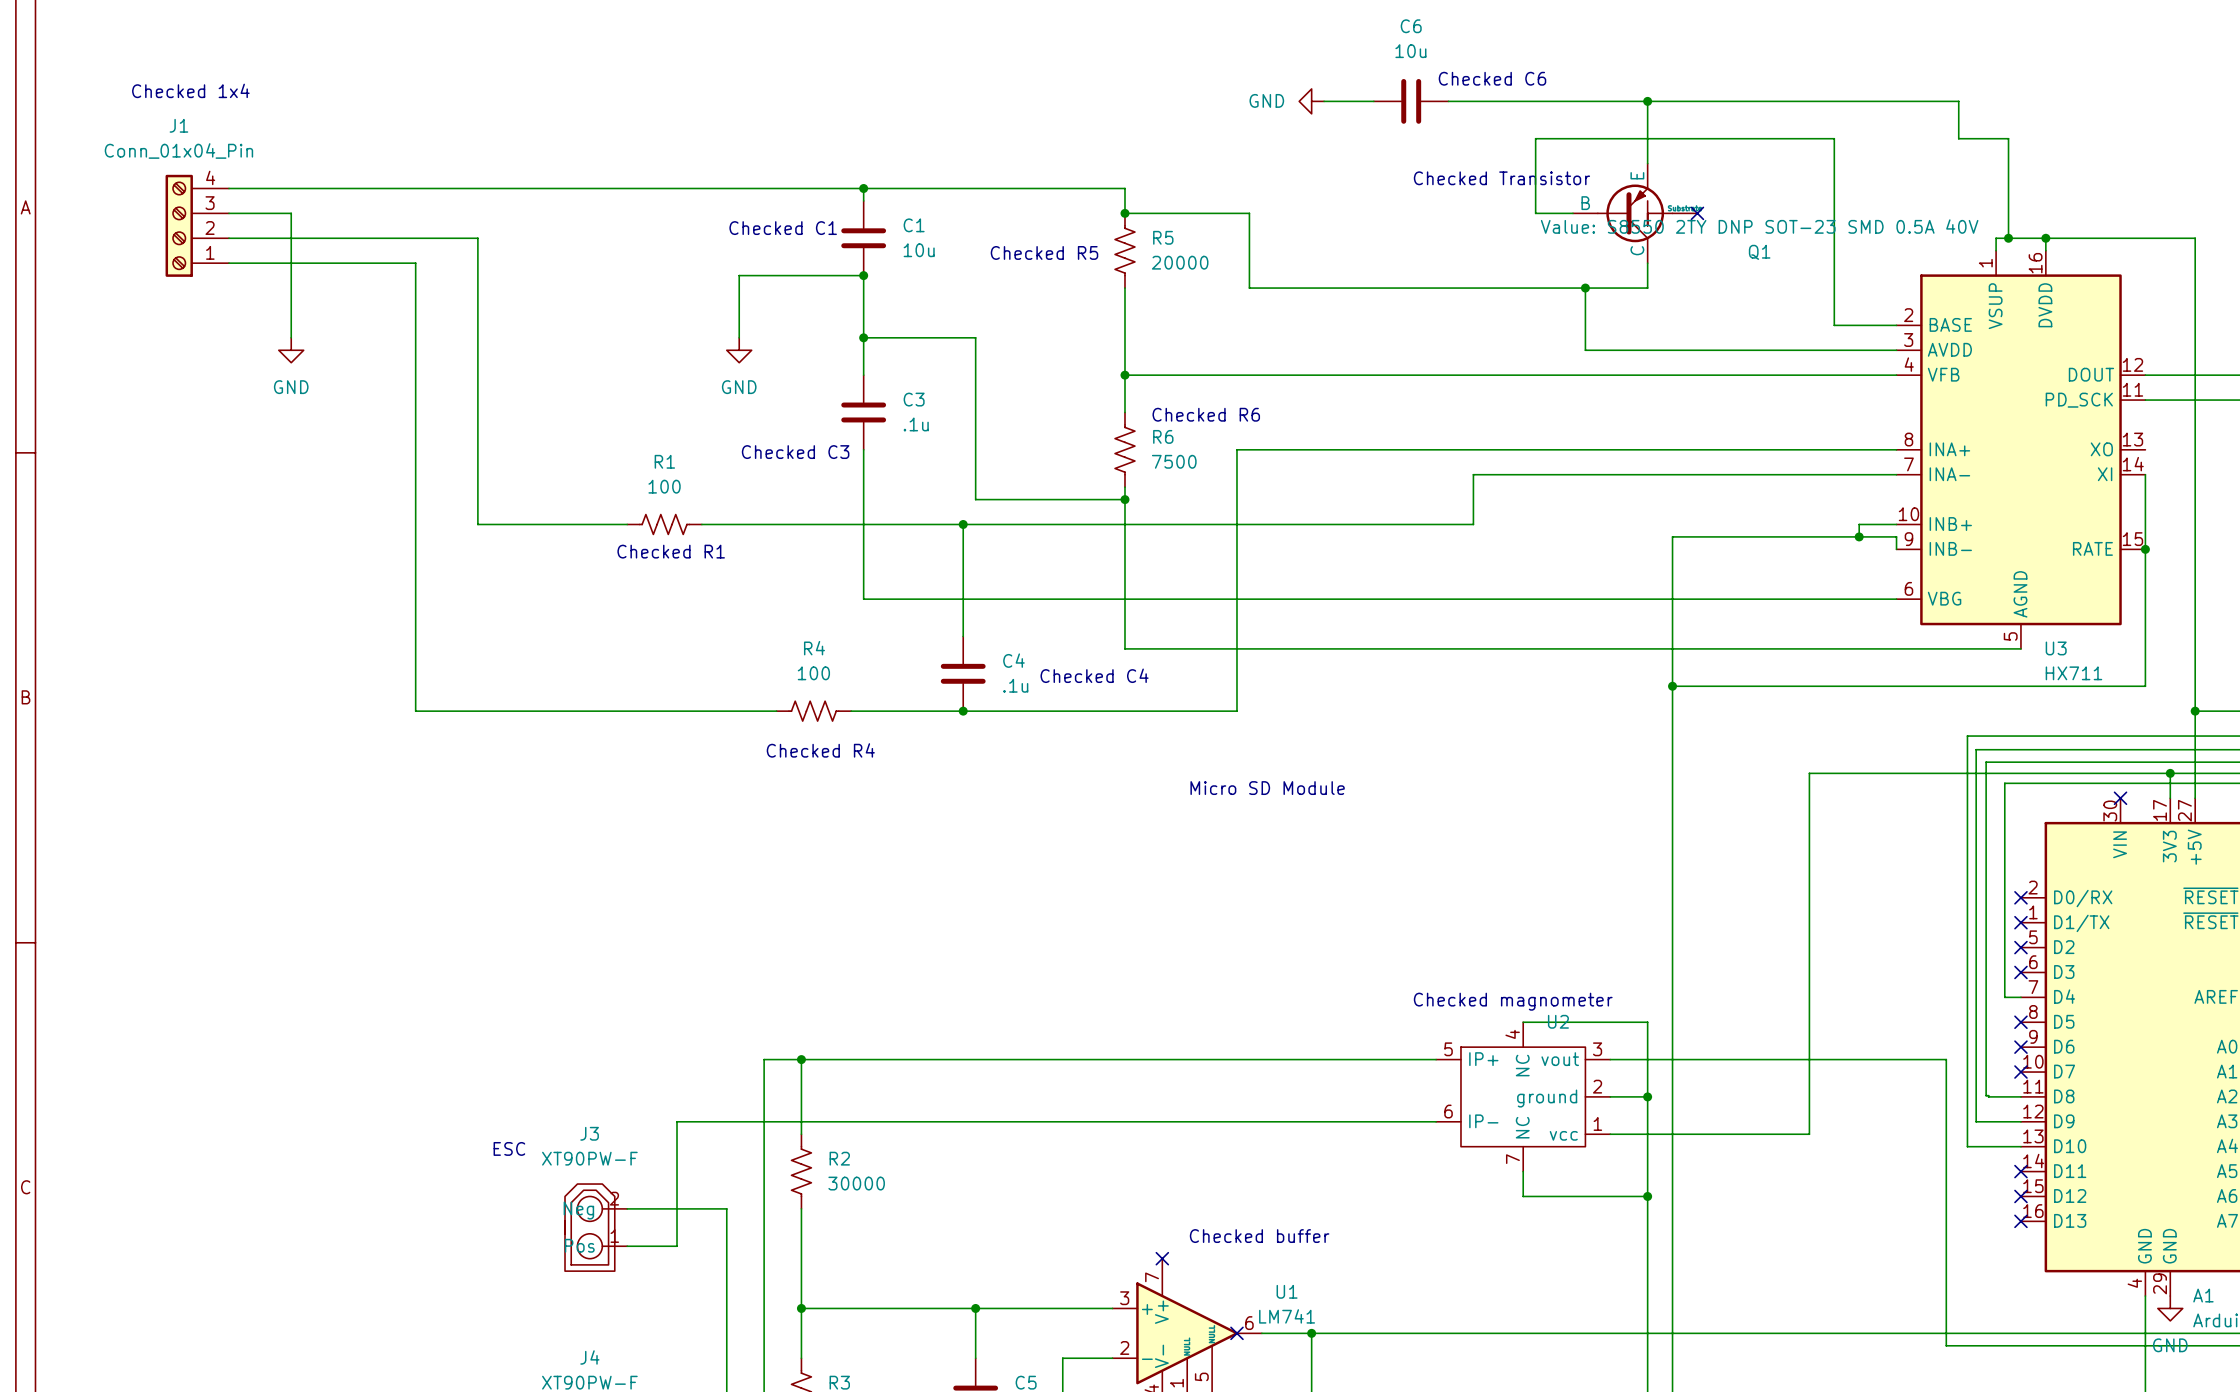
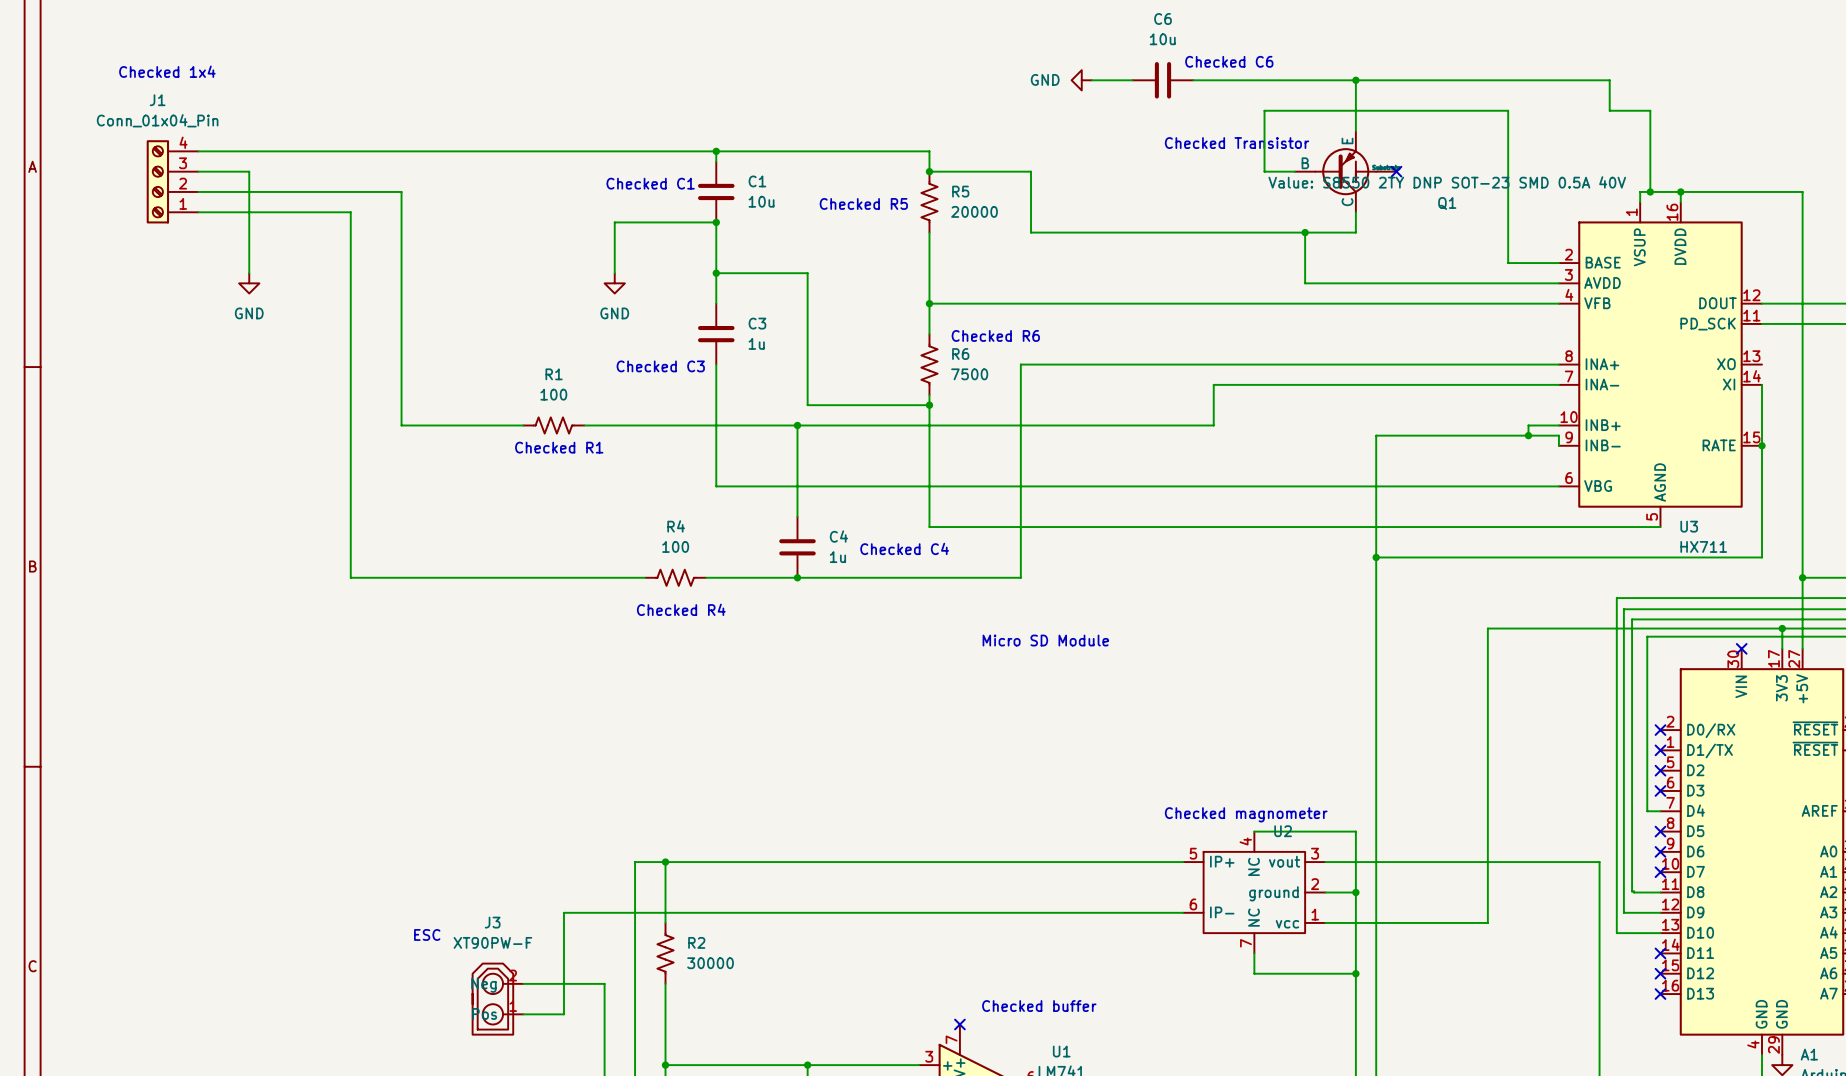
C3 value: .1u (916, 424) -> 1u (756, 343)
C4 value: .1u (1015, 685) -> 1u (837, 557)

